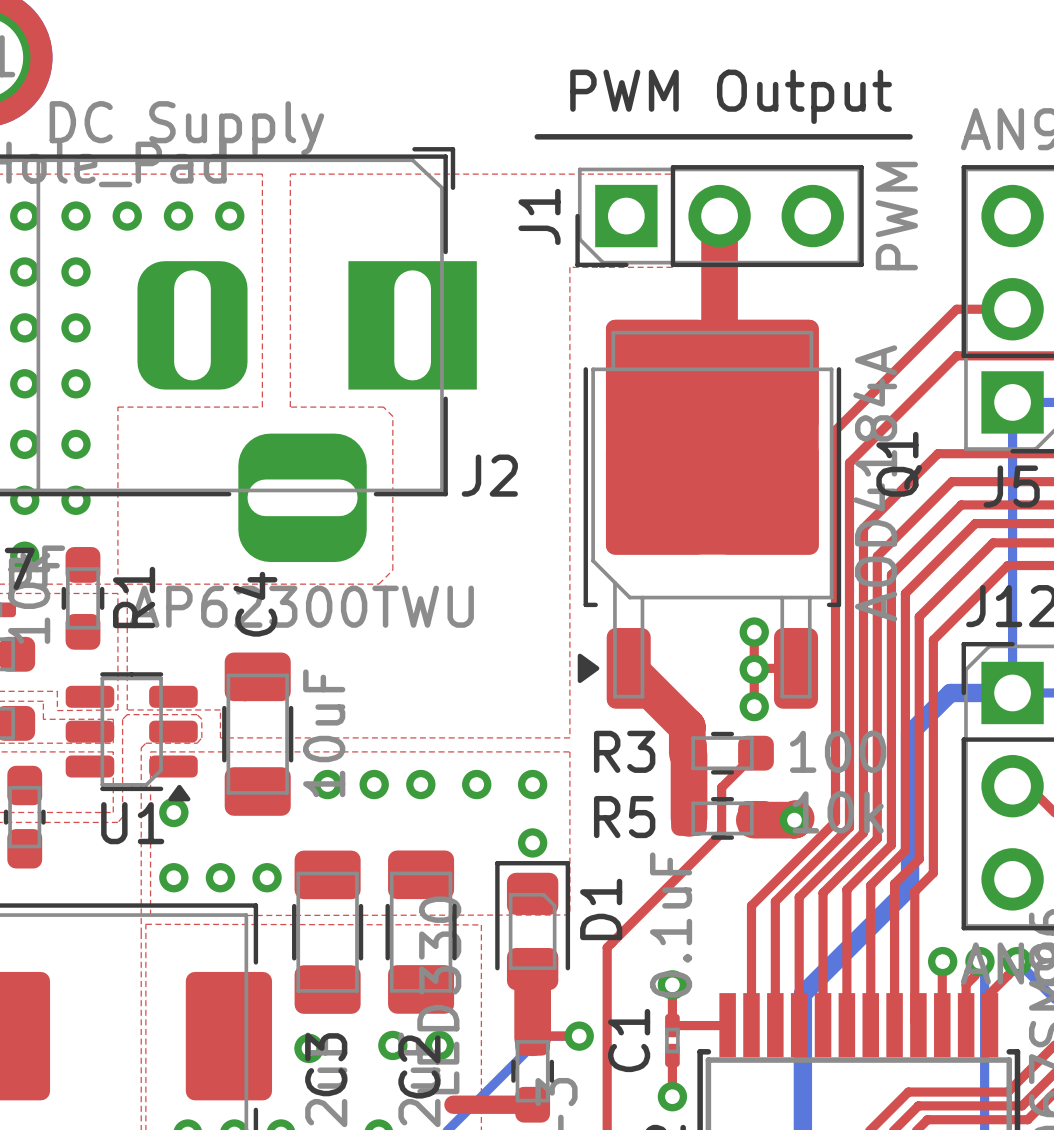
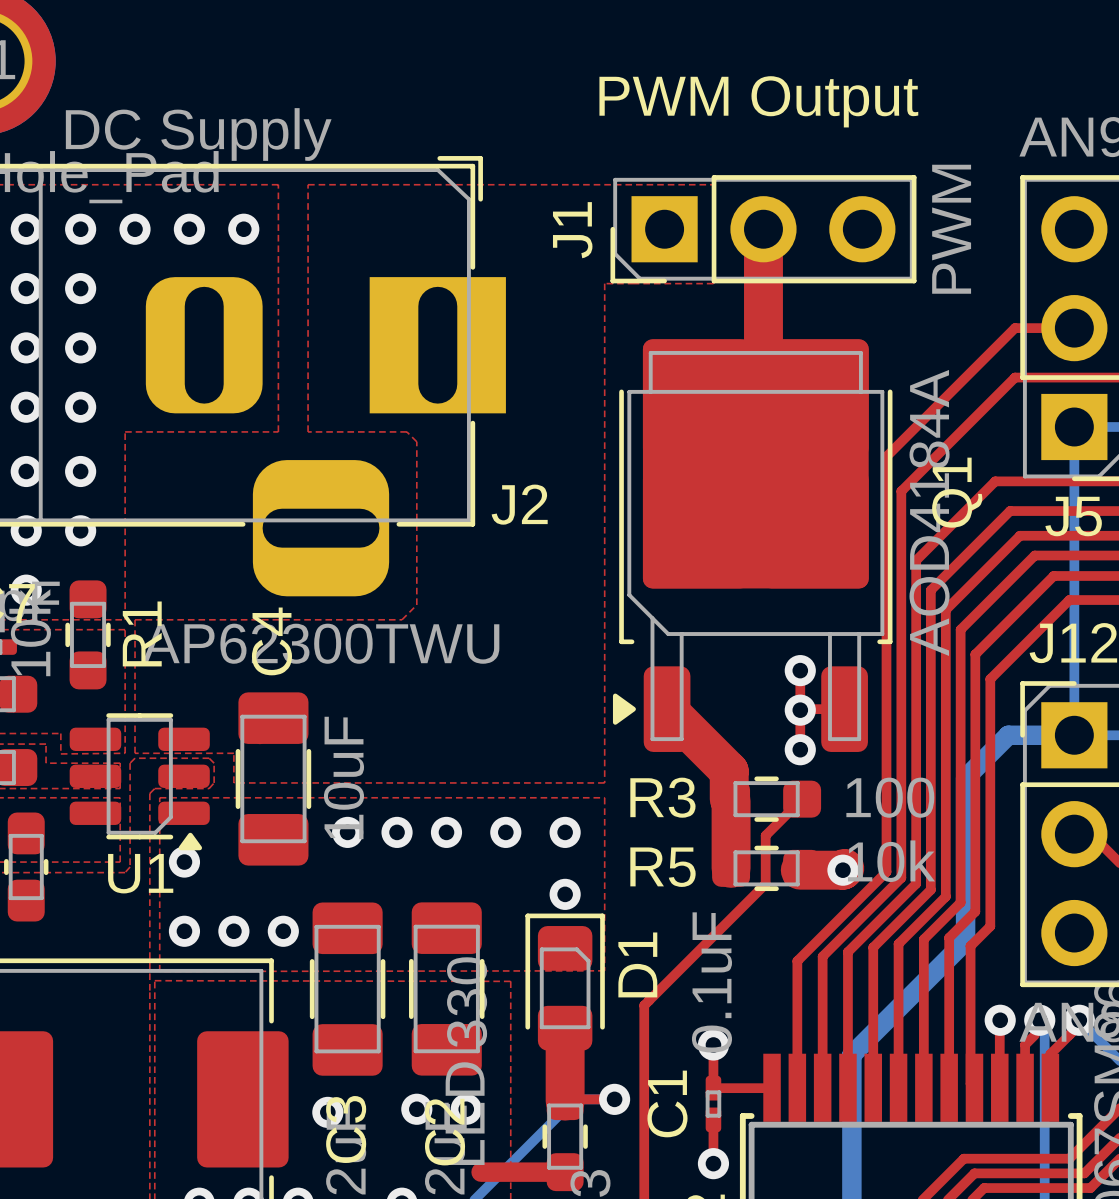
line: (537, 136) (910, 136) -> none

